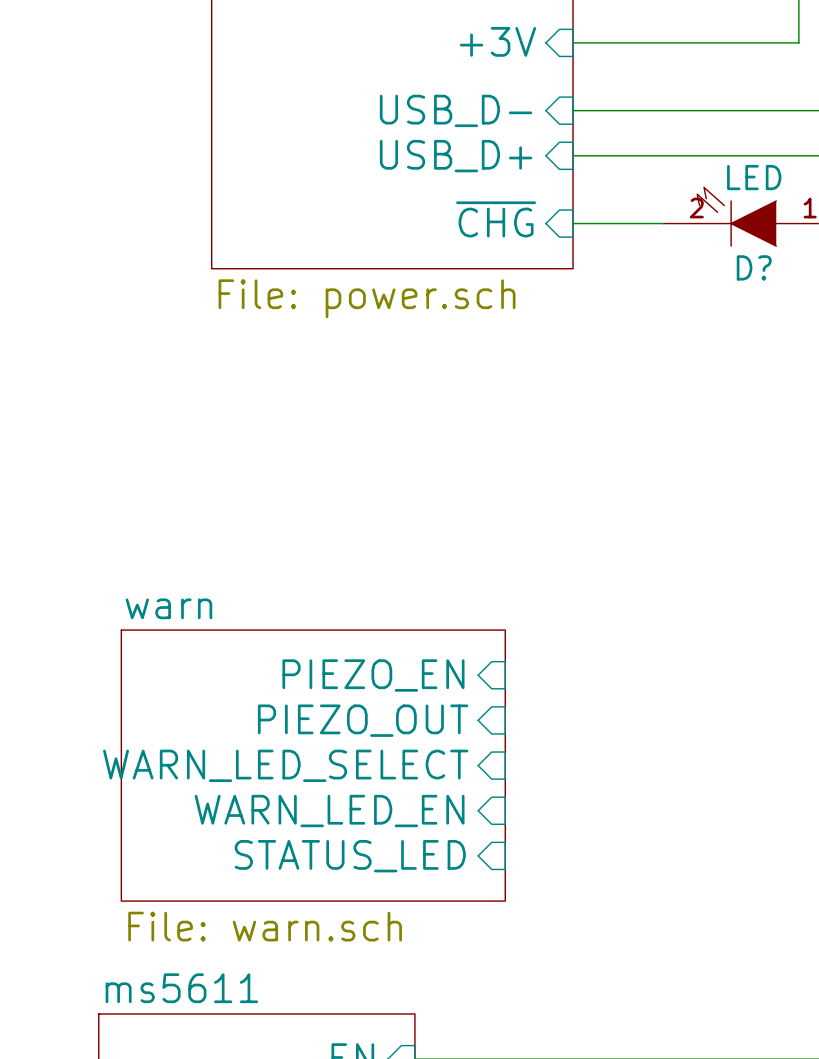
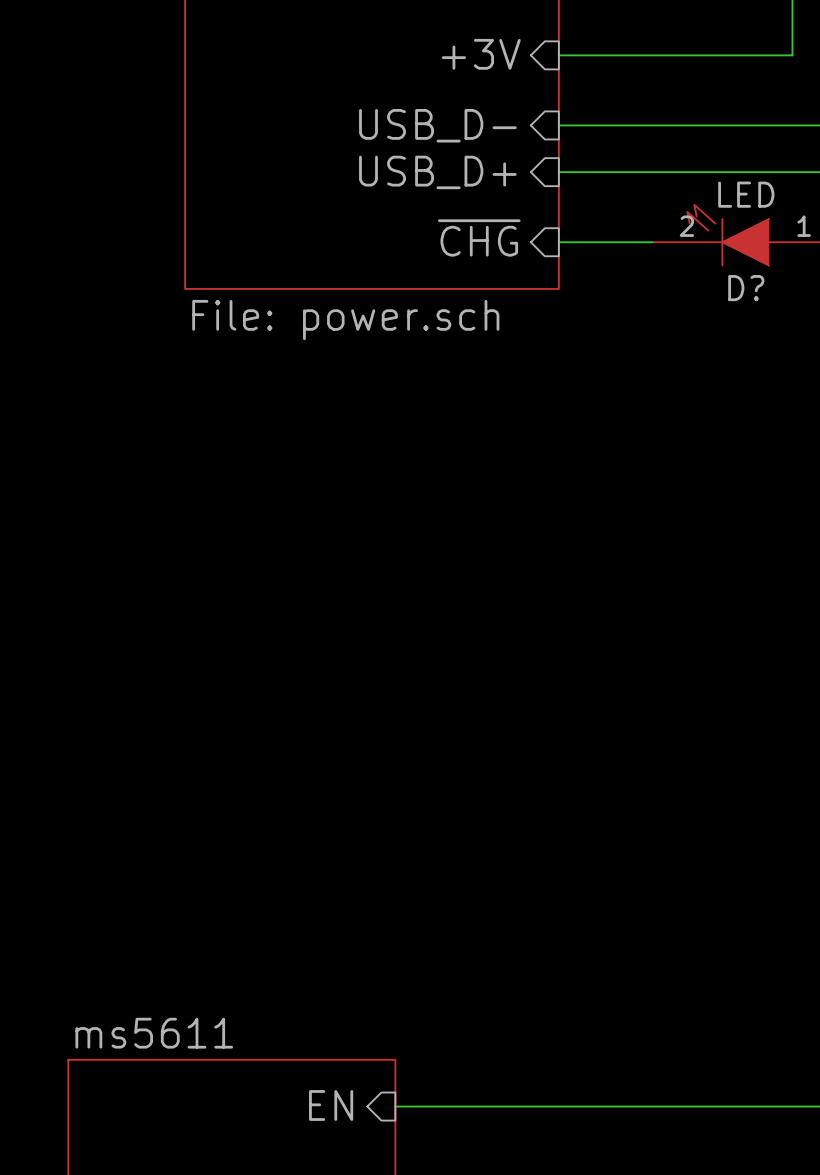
sheet pin: PIEZO_EN (373, 675) -> none
sheet pin: PIEZO_OUT (363, 720) -> none
sheet pin: WARN_LED_SELECT (285, 765) -> none
sheet warn: File: warn.sch (313, 765) -> none
sheet pin: WARN_LED_EN (329, 811) -> none
sheet pin: STATUS_LED (350, 856) -> none

